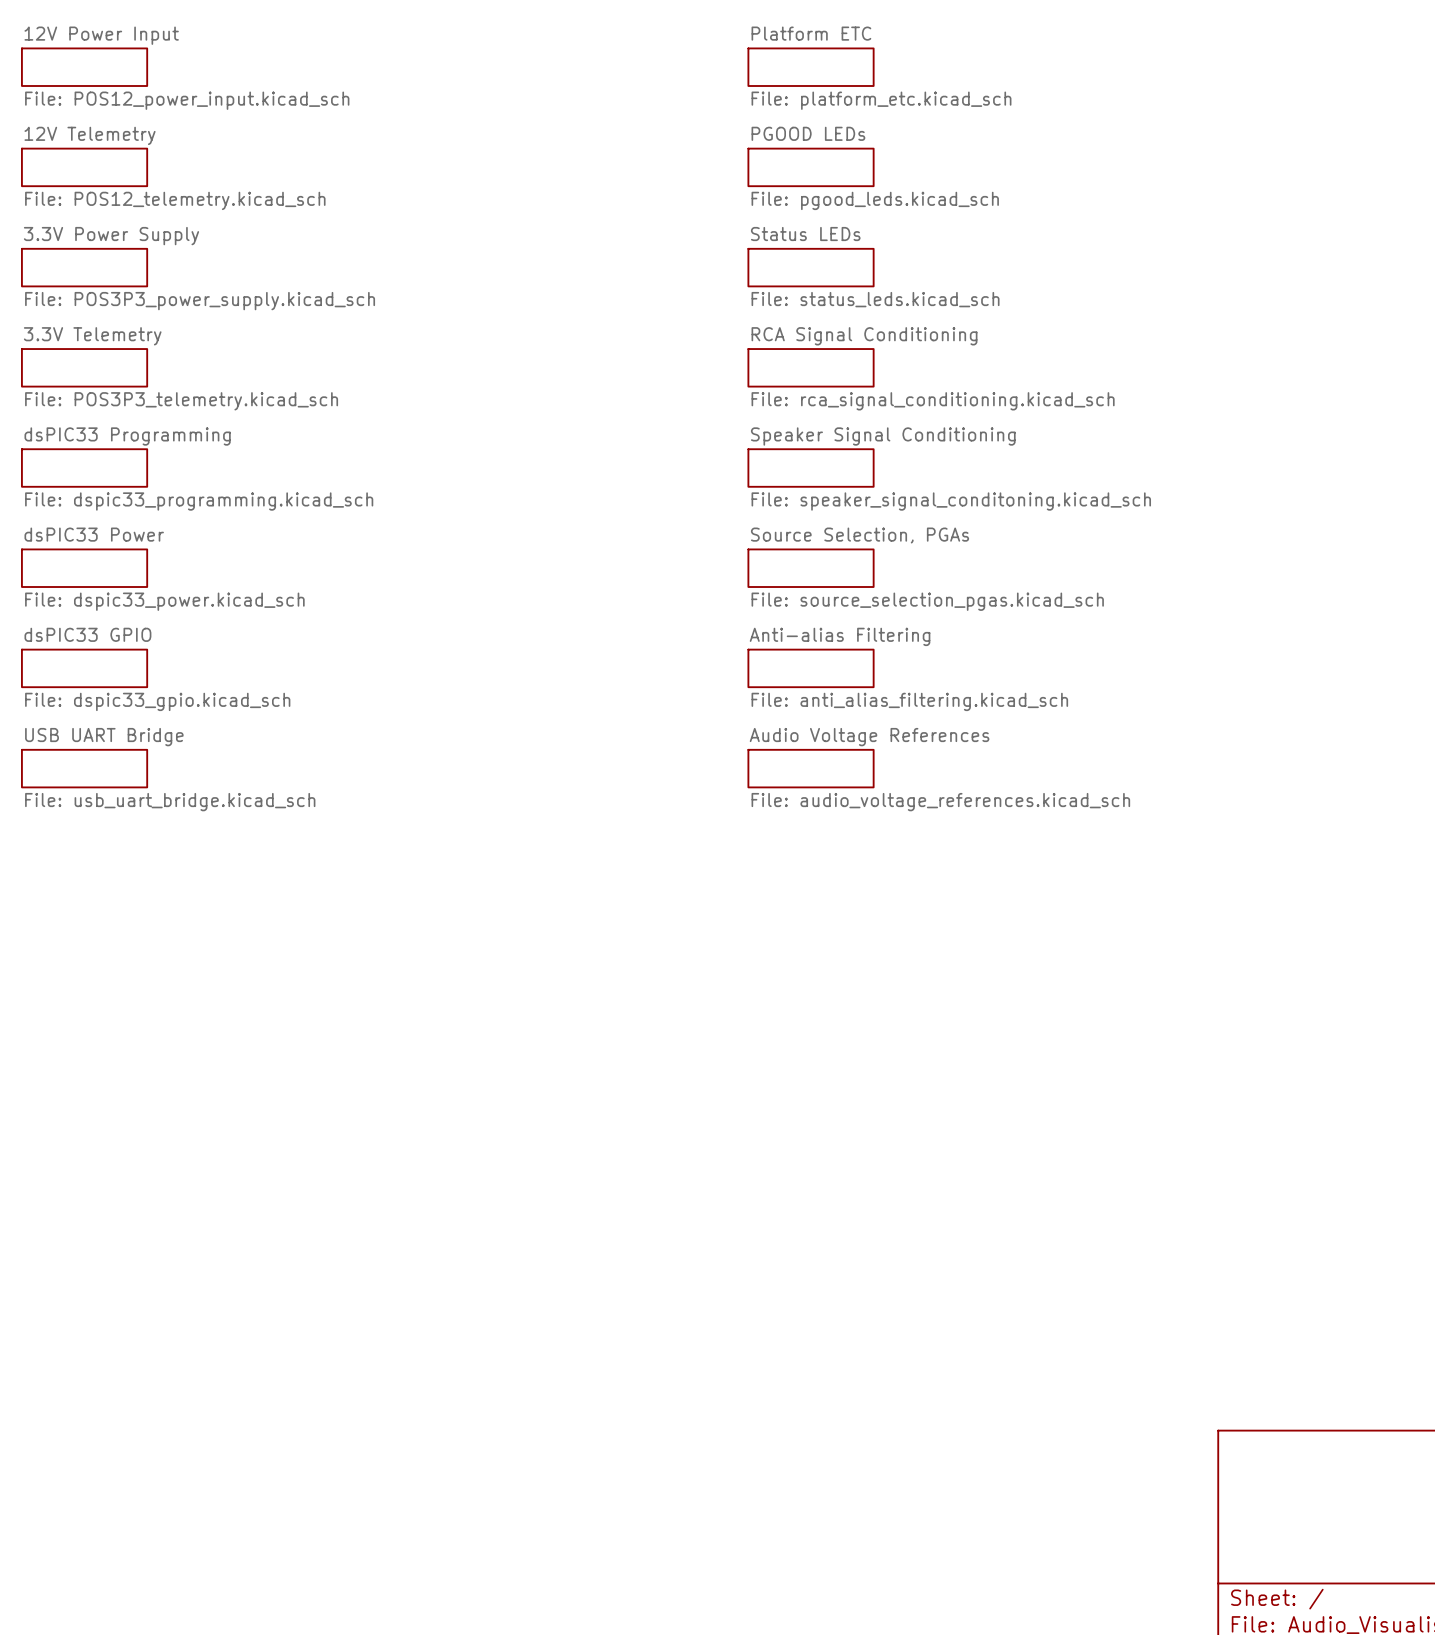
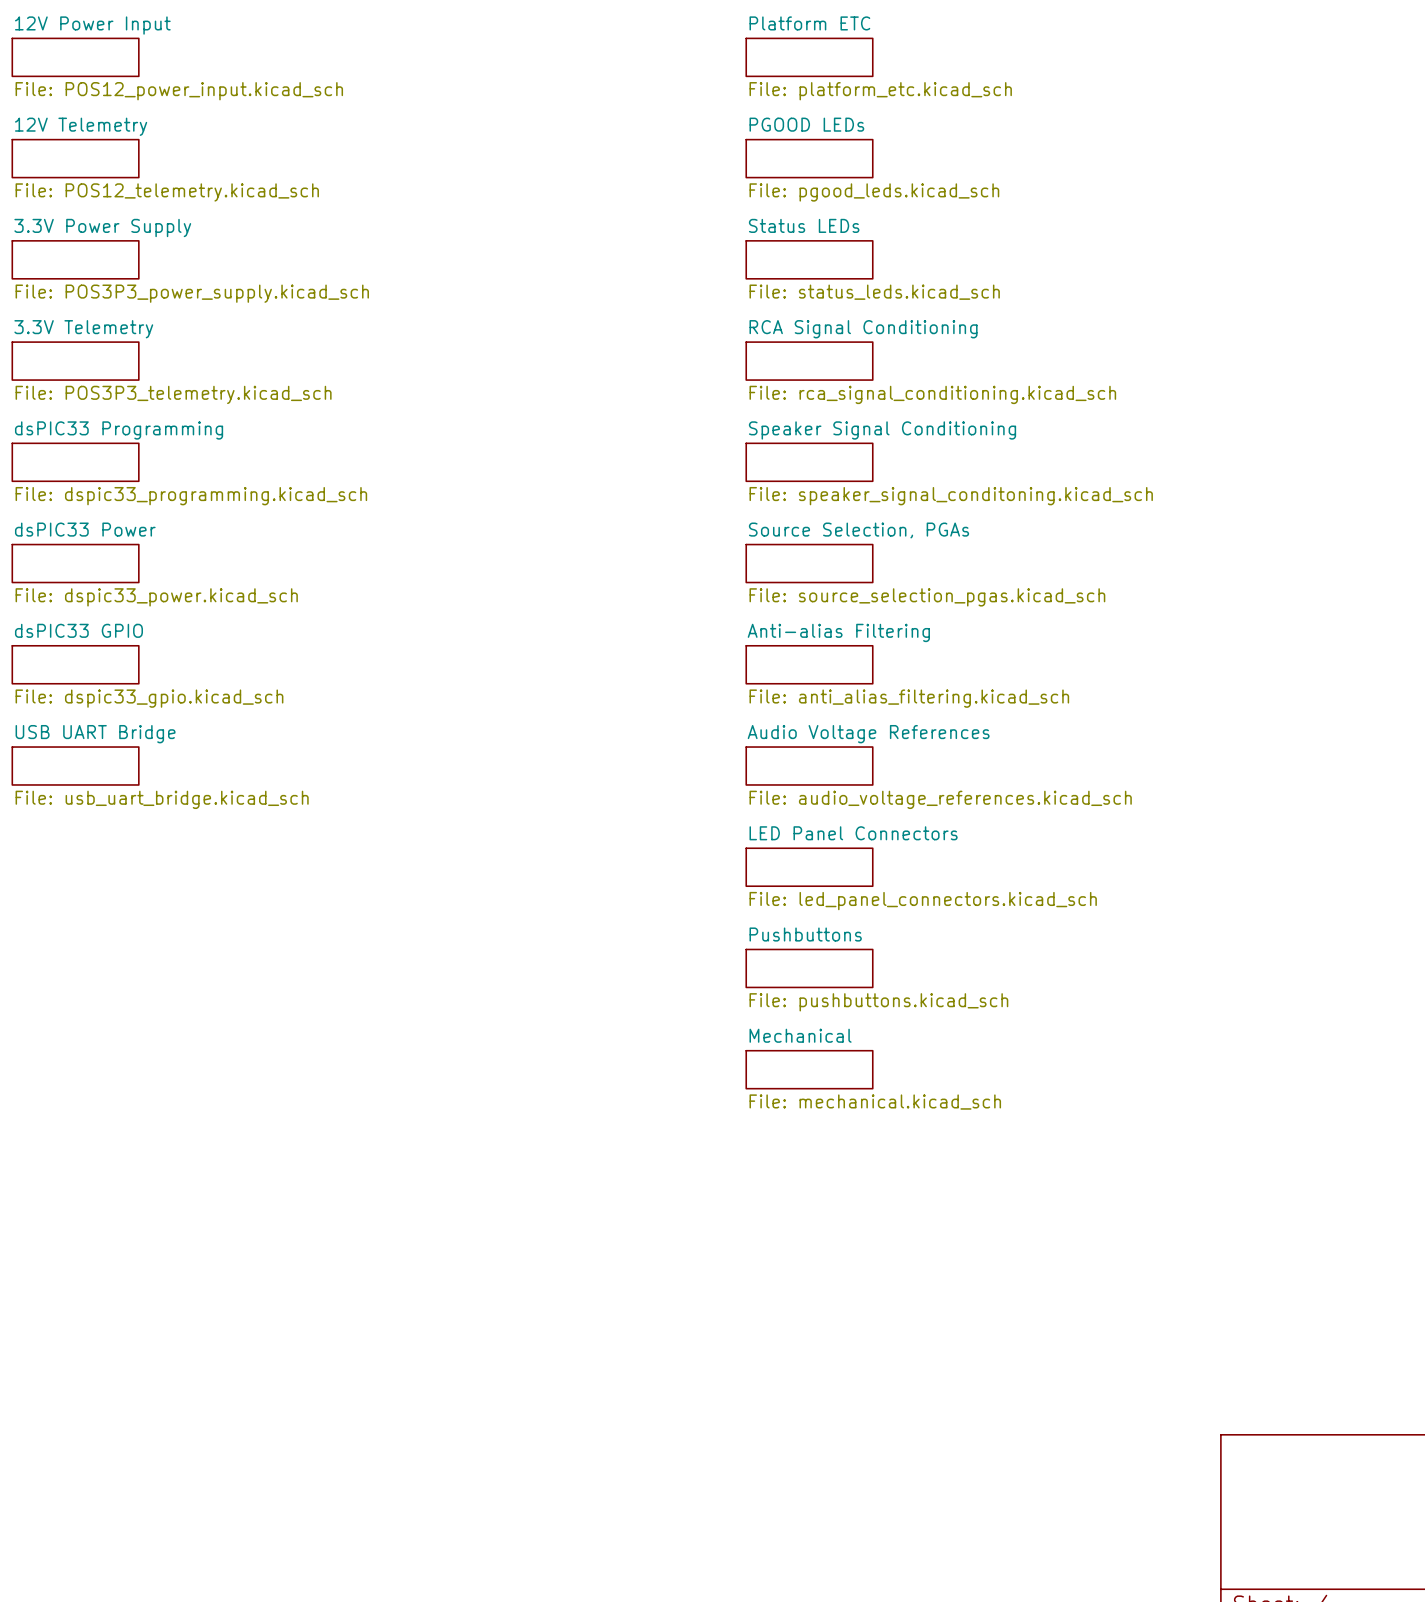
sheet LED Panel Connectors: none -> File: led_panel_connectors.kicad_sch (809, 867)
sheet Pushbuttons: none -> File: pushbuttons.kicad_sch (809, 968)
sheet Mechanical: none -> File: mechanical.kicad_sch (809, 1069)

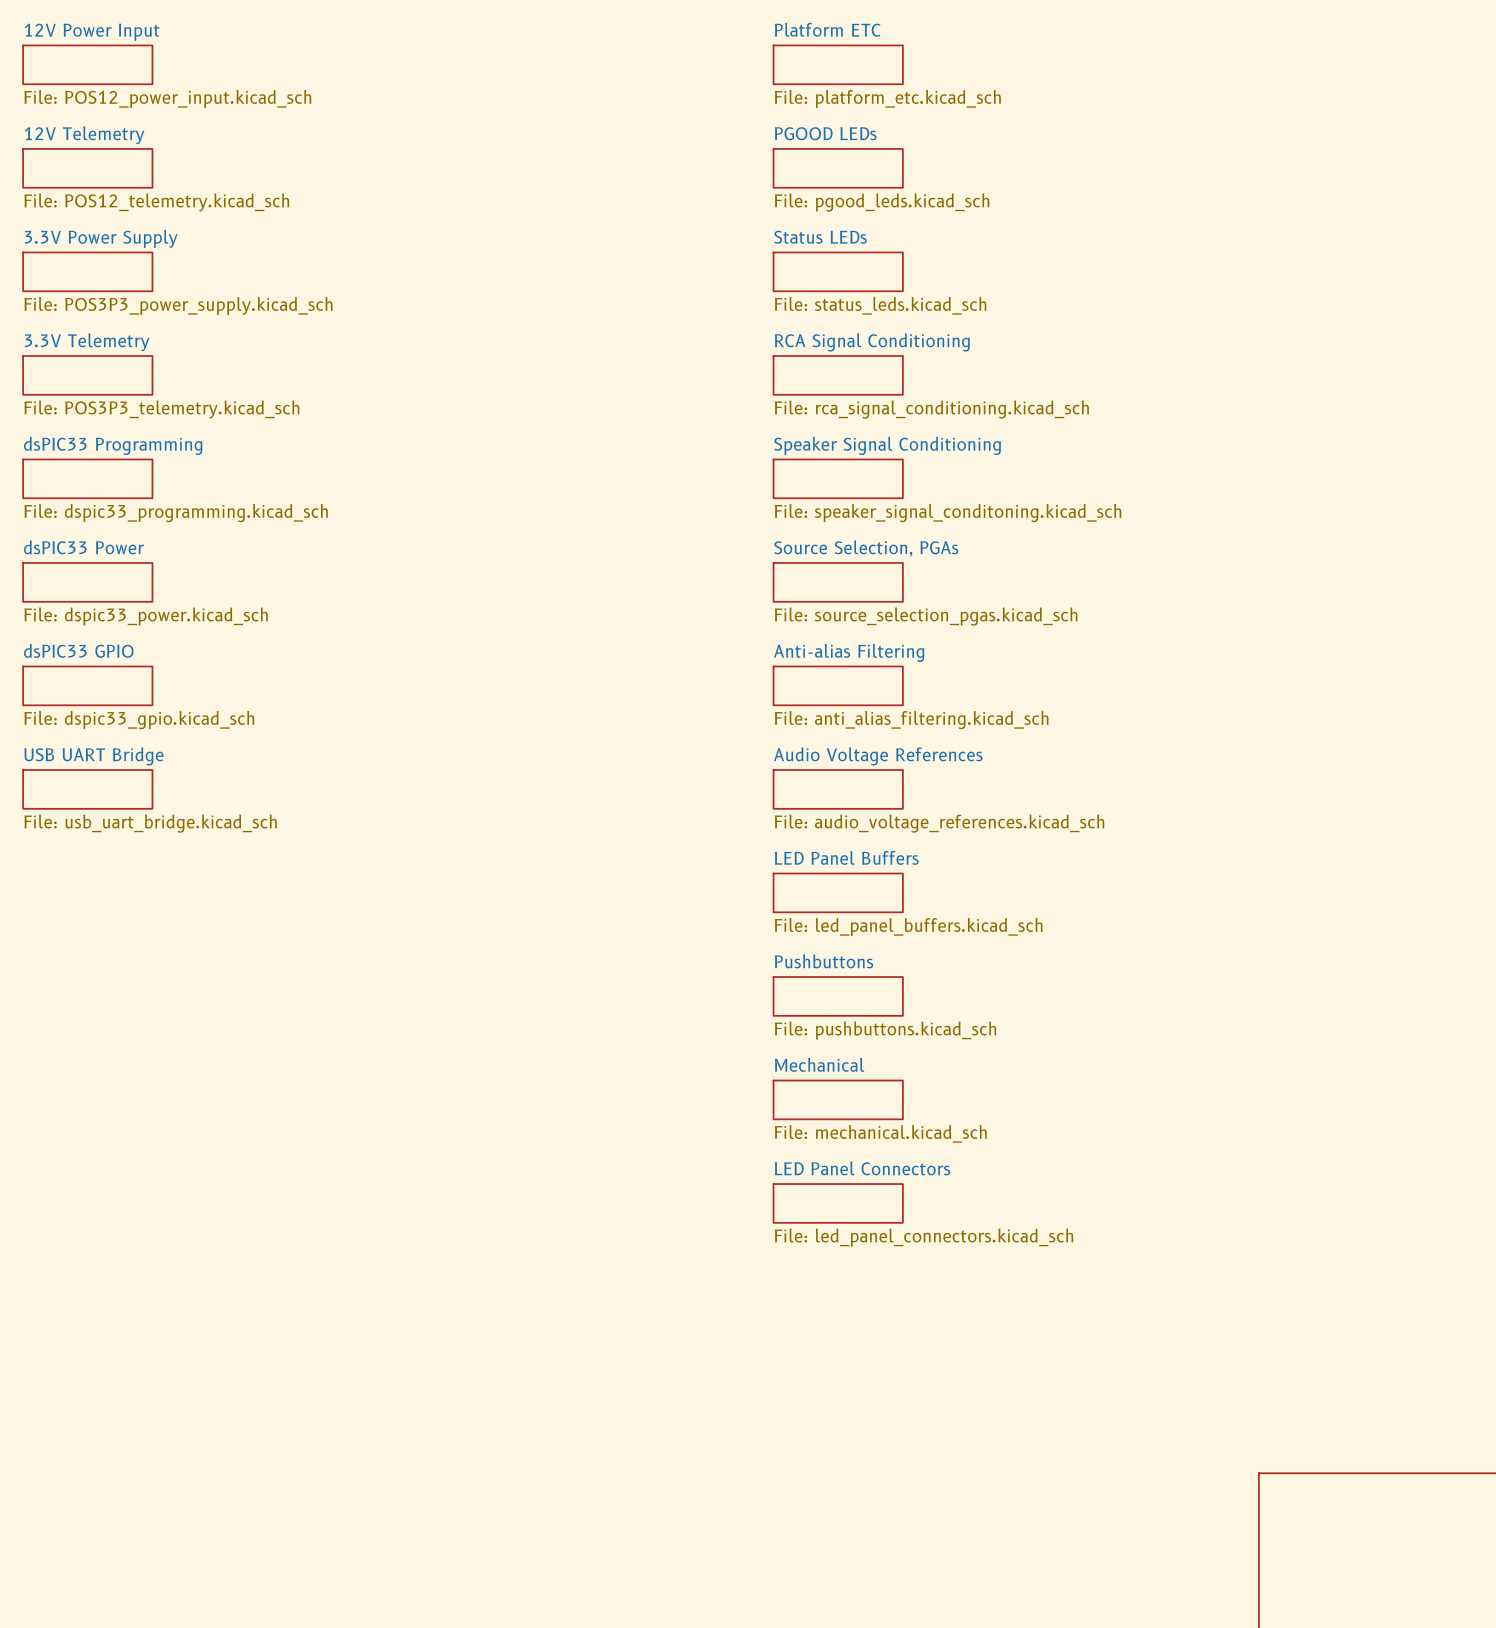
sheet LED Panel Connectors name: LED Panel Connectors (853, 833) -> LED Panel Buffers (846, 857)
sheet LED Panel Connectors value: File: led_panel_connectors.kicad_sch (923, 901) -> File: led_panel_buffers.kicad_sch (908, 927)
sheet LED Panel Connectors: none -> File: led_panel_connectors.kicad_sch (838, 1203)

